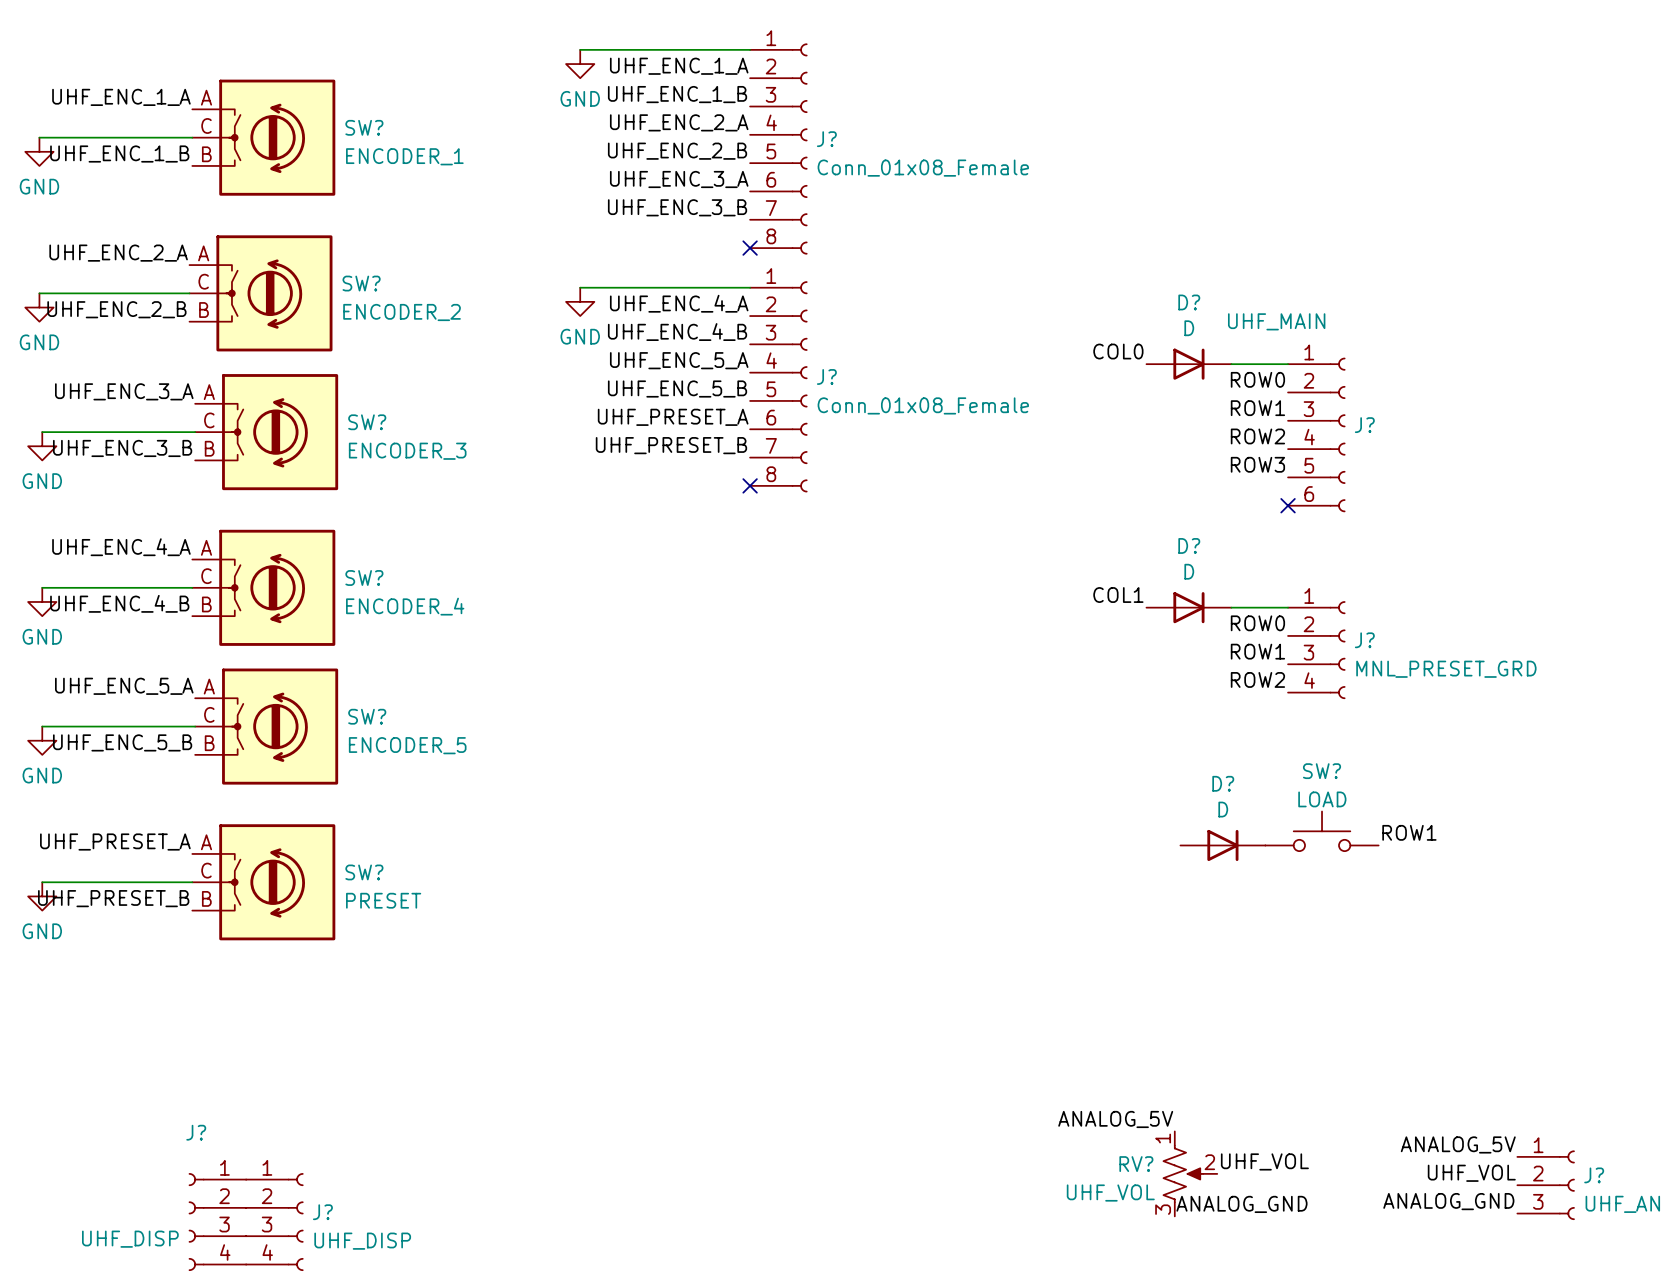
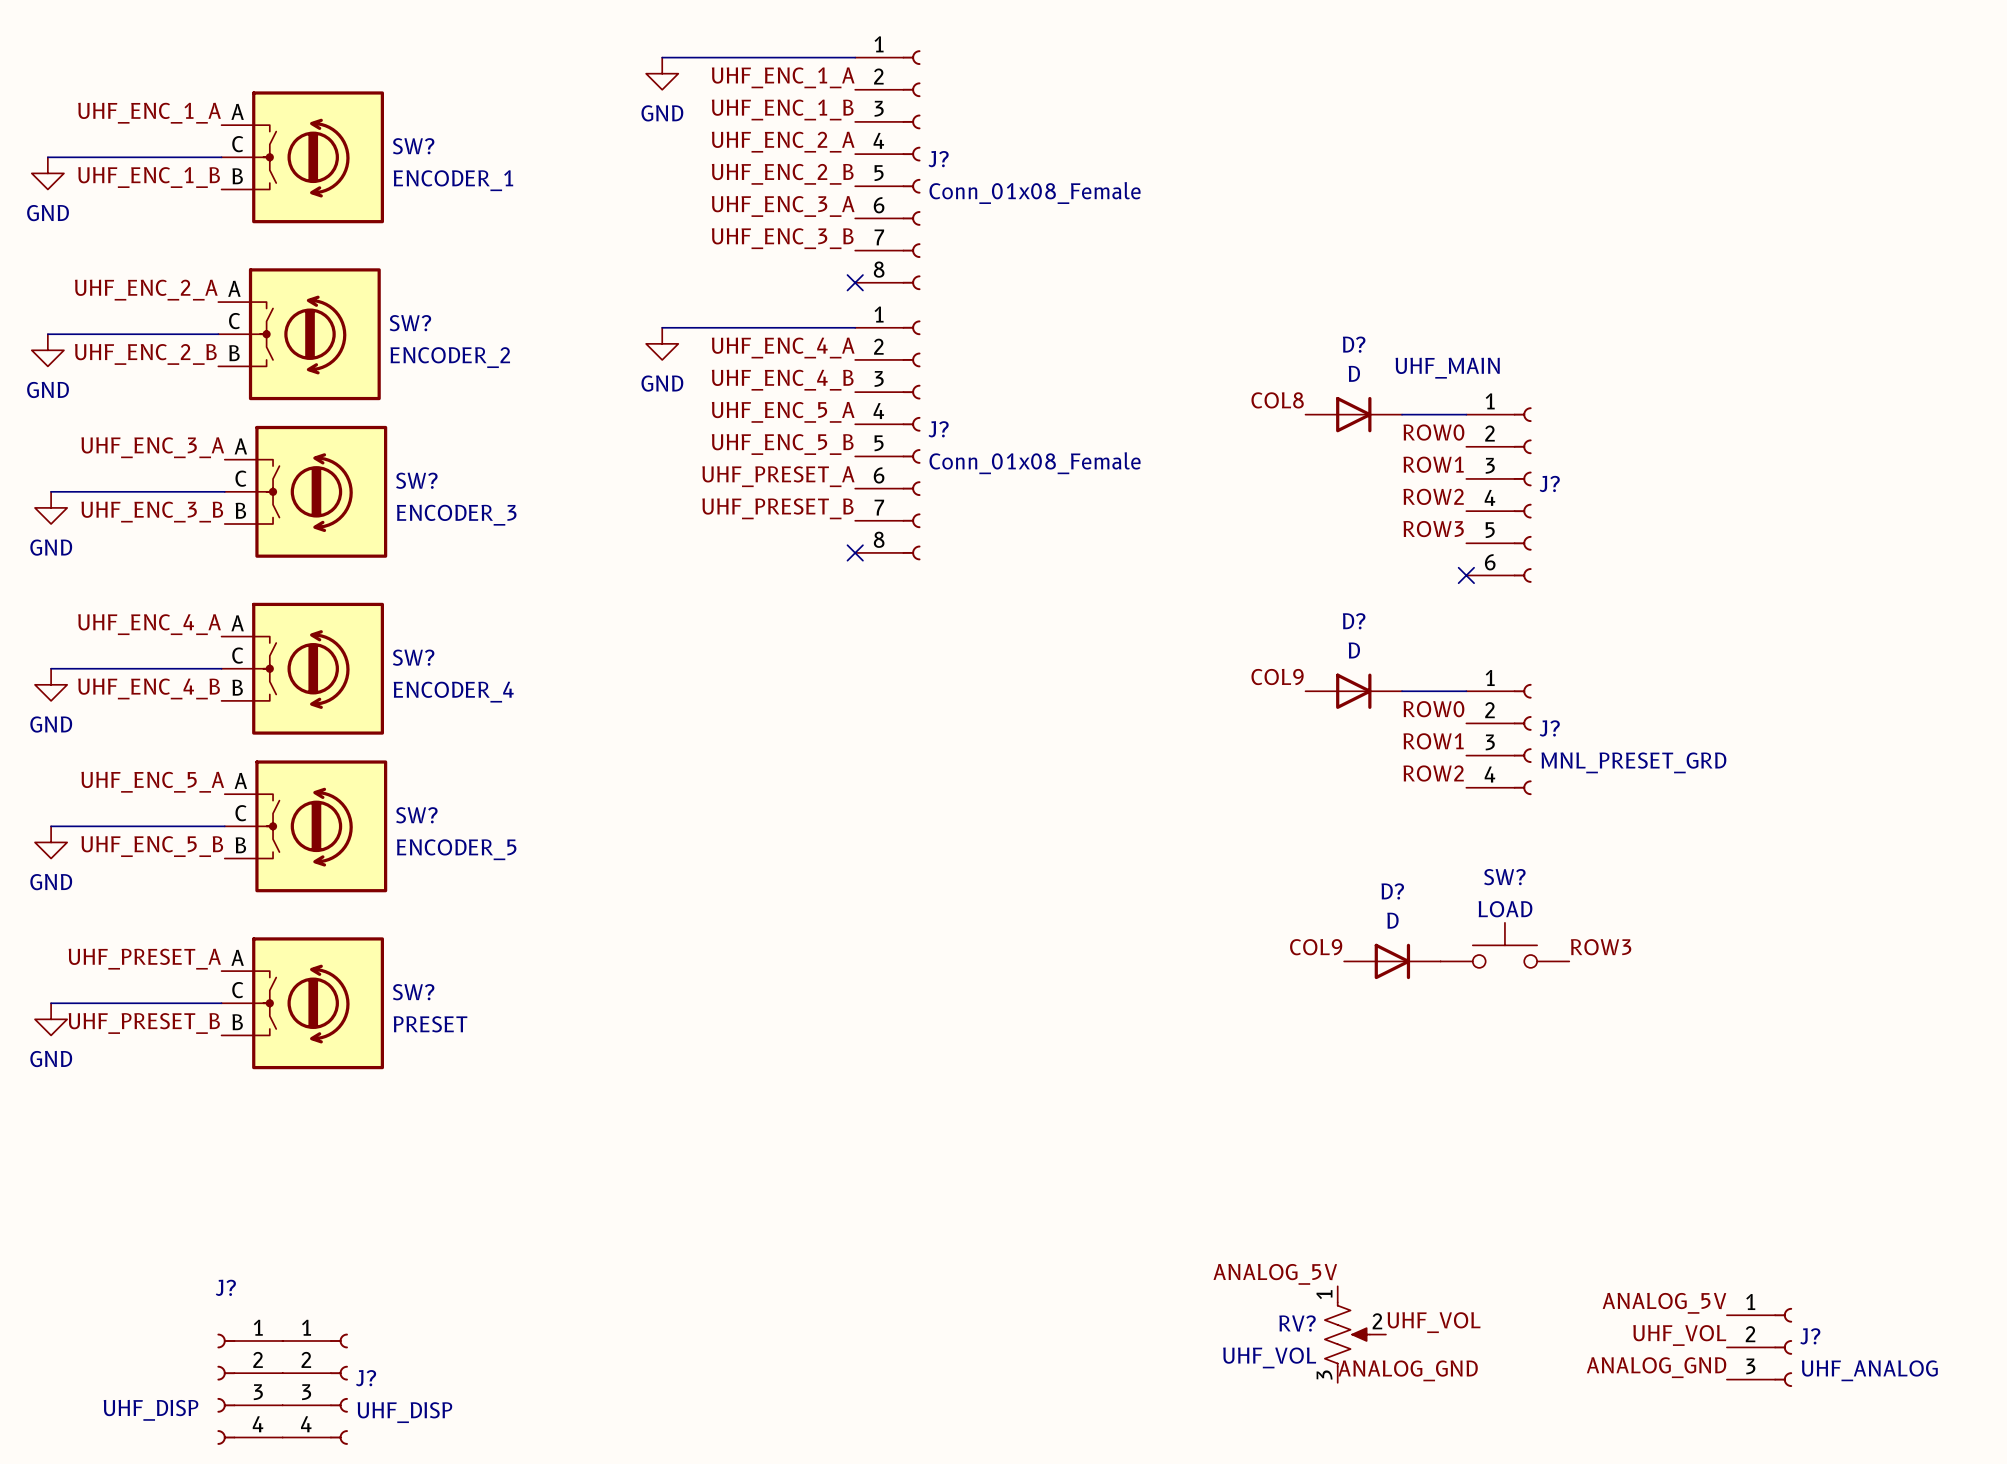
label: COL0 (1118, 351) -> COL8 (1277, 400)
label: COL1 (1118, 595) -> COL9 (1277, 676)
label: none -> COL9 (1316, 947)
label: ROW1 (1409, 832) -> ROW3 (1601, 947)

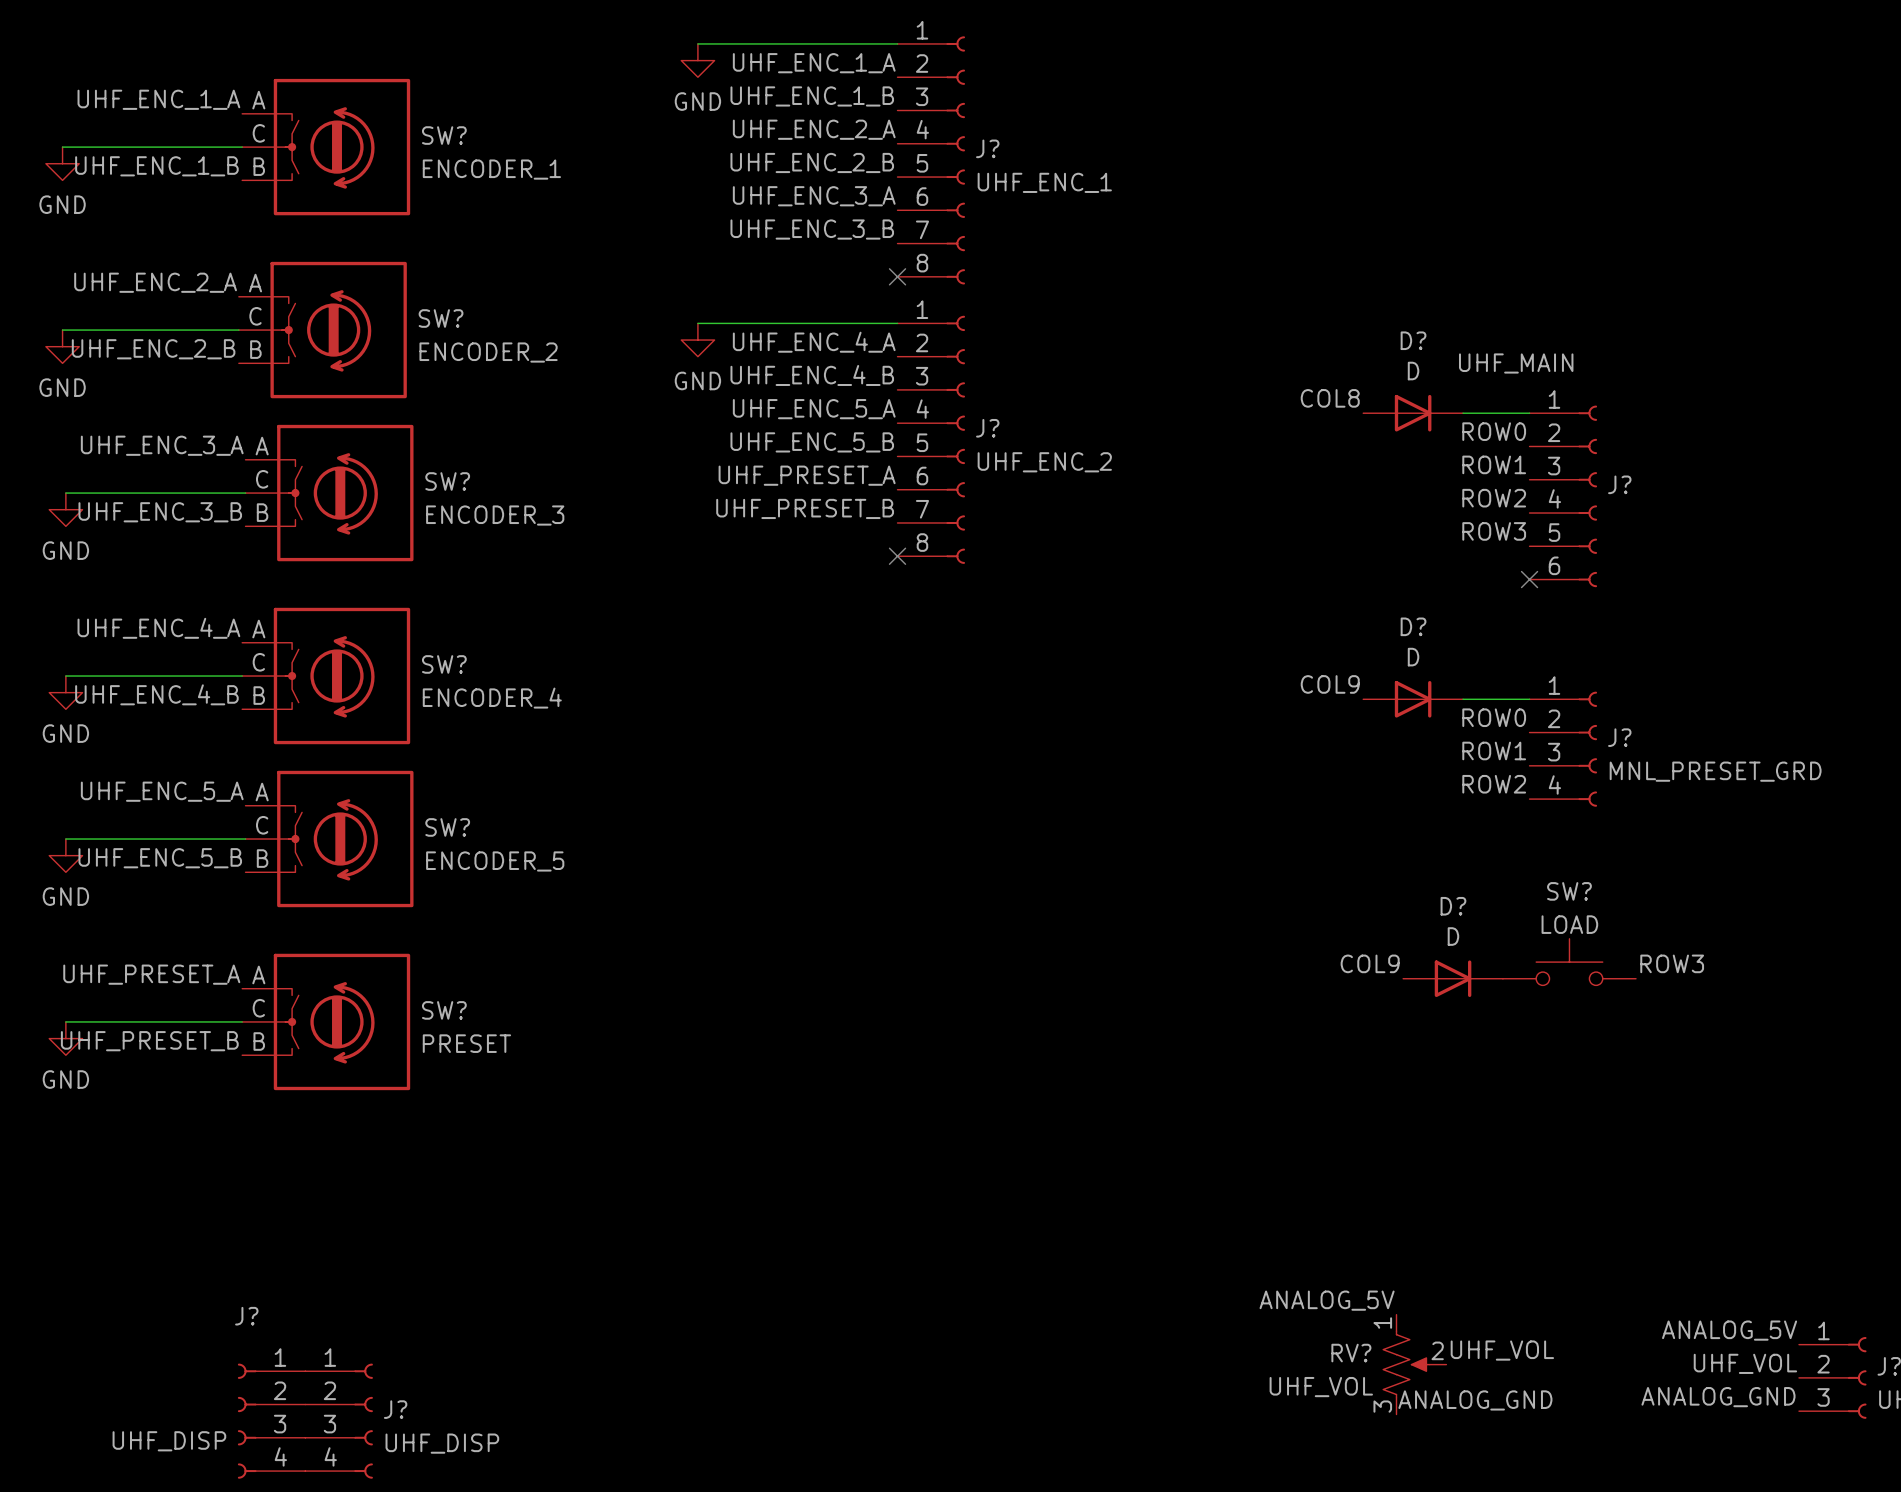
J? value: Conn_01x08_Female (1035, 193) -> UHF_ENC_1 (1044, 182)
J? value: Conn_01x08_Female (1035, 463) -> UHF_ENC_2 (1044, 462)

